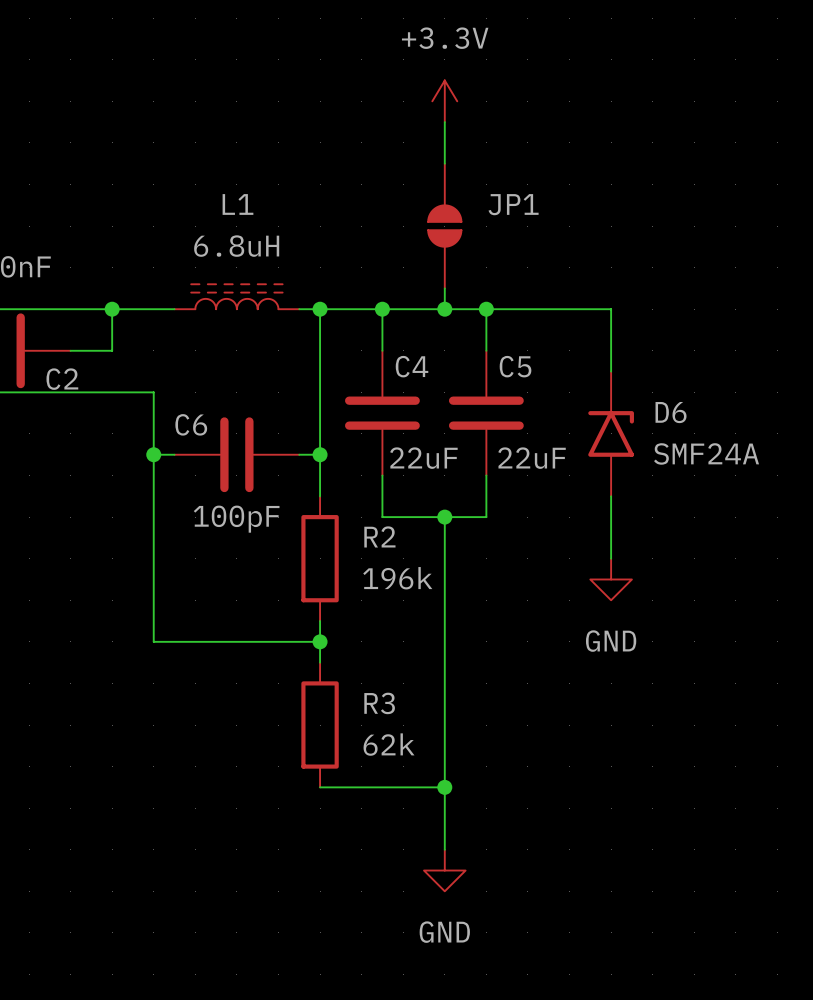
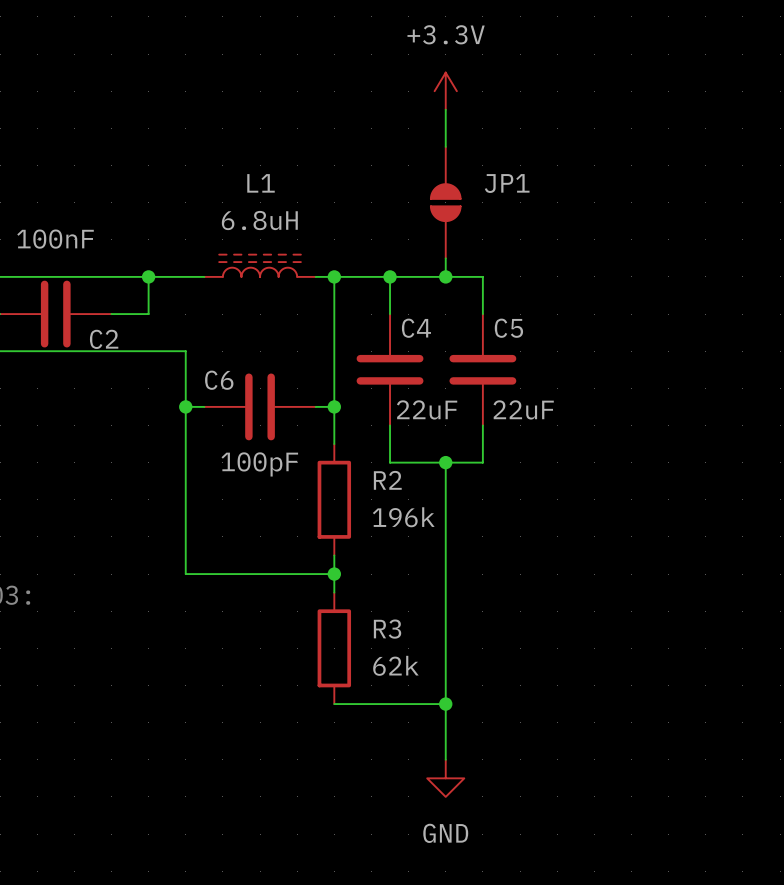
wire: (486, 309) (611, 309) (611, 371) -> none
junction: (486, 309) -> none
D6: SMF24A (611, 433) -> none
wire: (611, 496) (611, 558) -> none
power symbol: GND (611, 579) -> none

